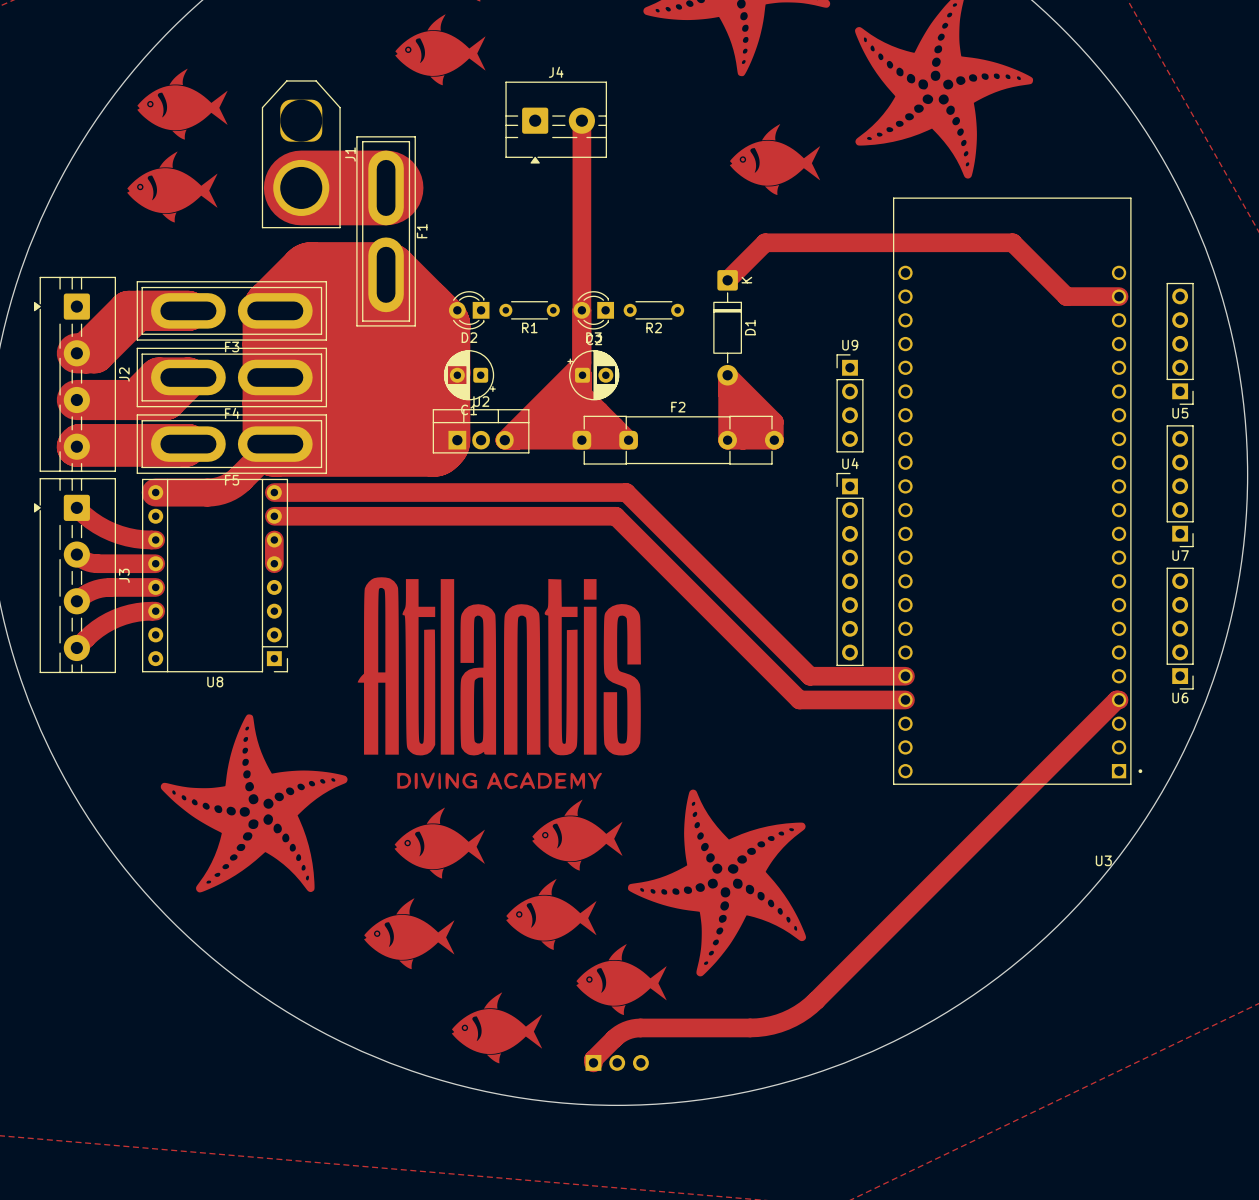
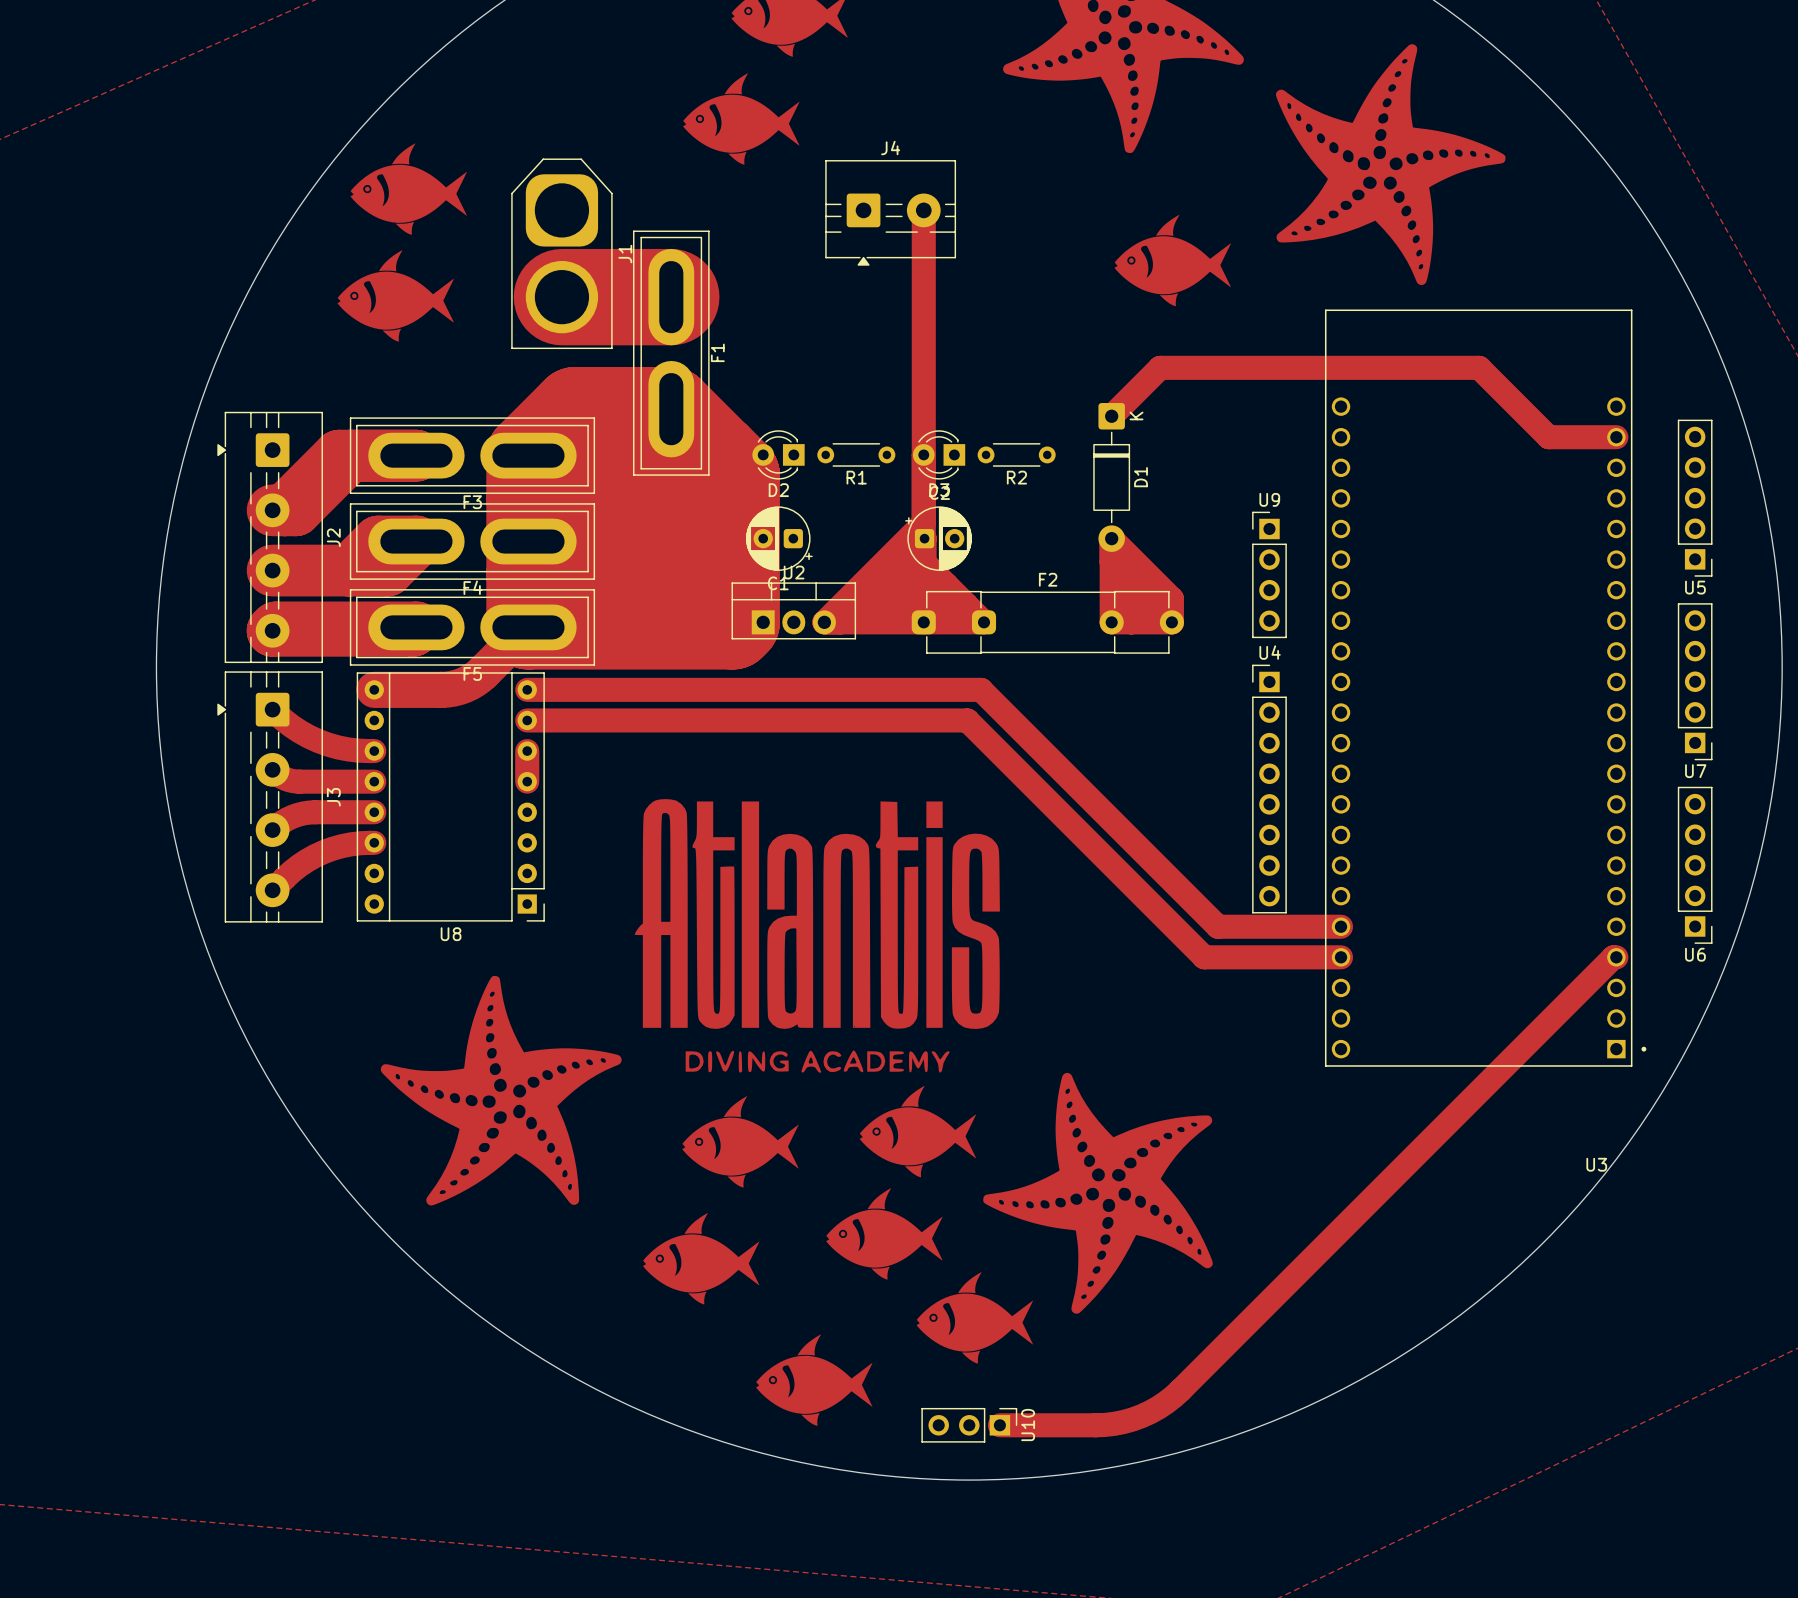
J1 footprint: [261, 80, 341, 229] -> [511, 158, 613, 350]
track: (816, 1000) (792, 1017) (764, 1026) (629, 1029) (614, 1038) (593, 1059) (593, 1062) -> (1225, 1344) (1173, 1396) (1158, 1407) (1132, 1419) (1105, 1424) (999, 1425)
U10 side: bottom (617, 1062) -> top (969, 1425)

